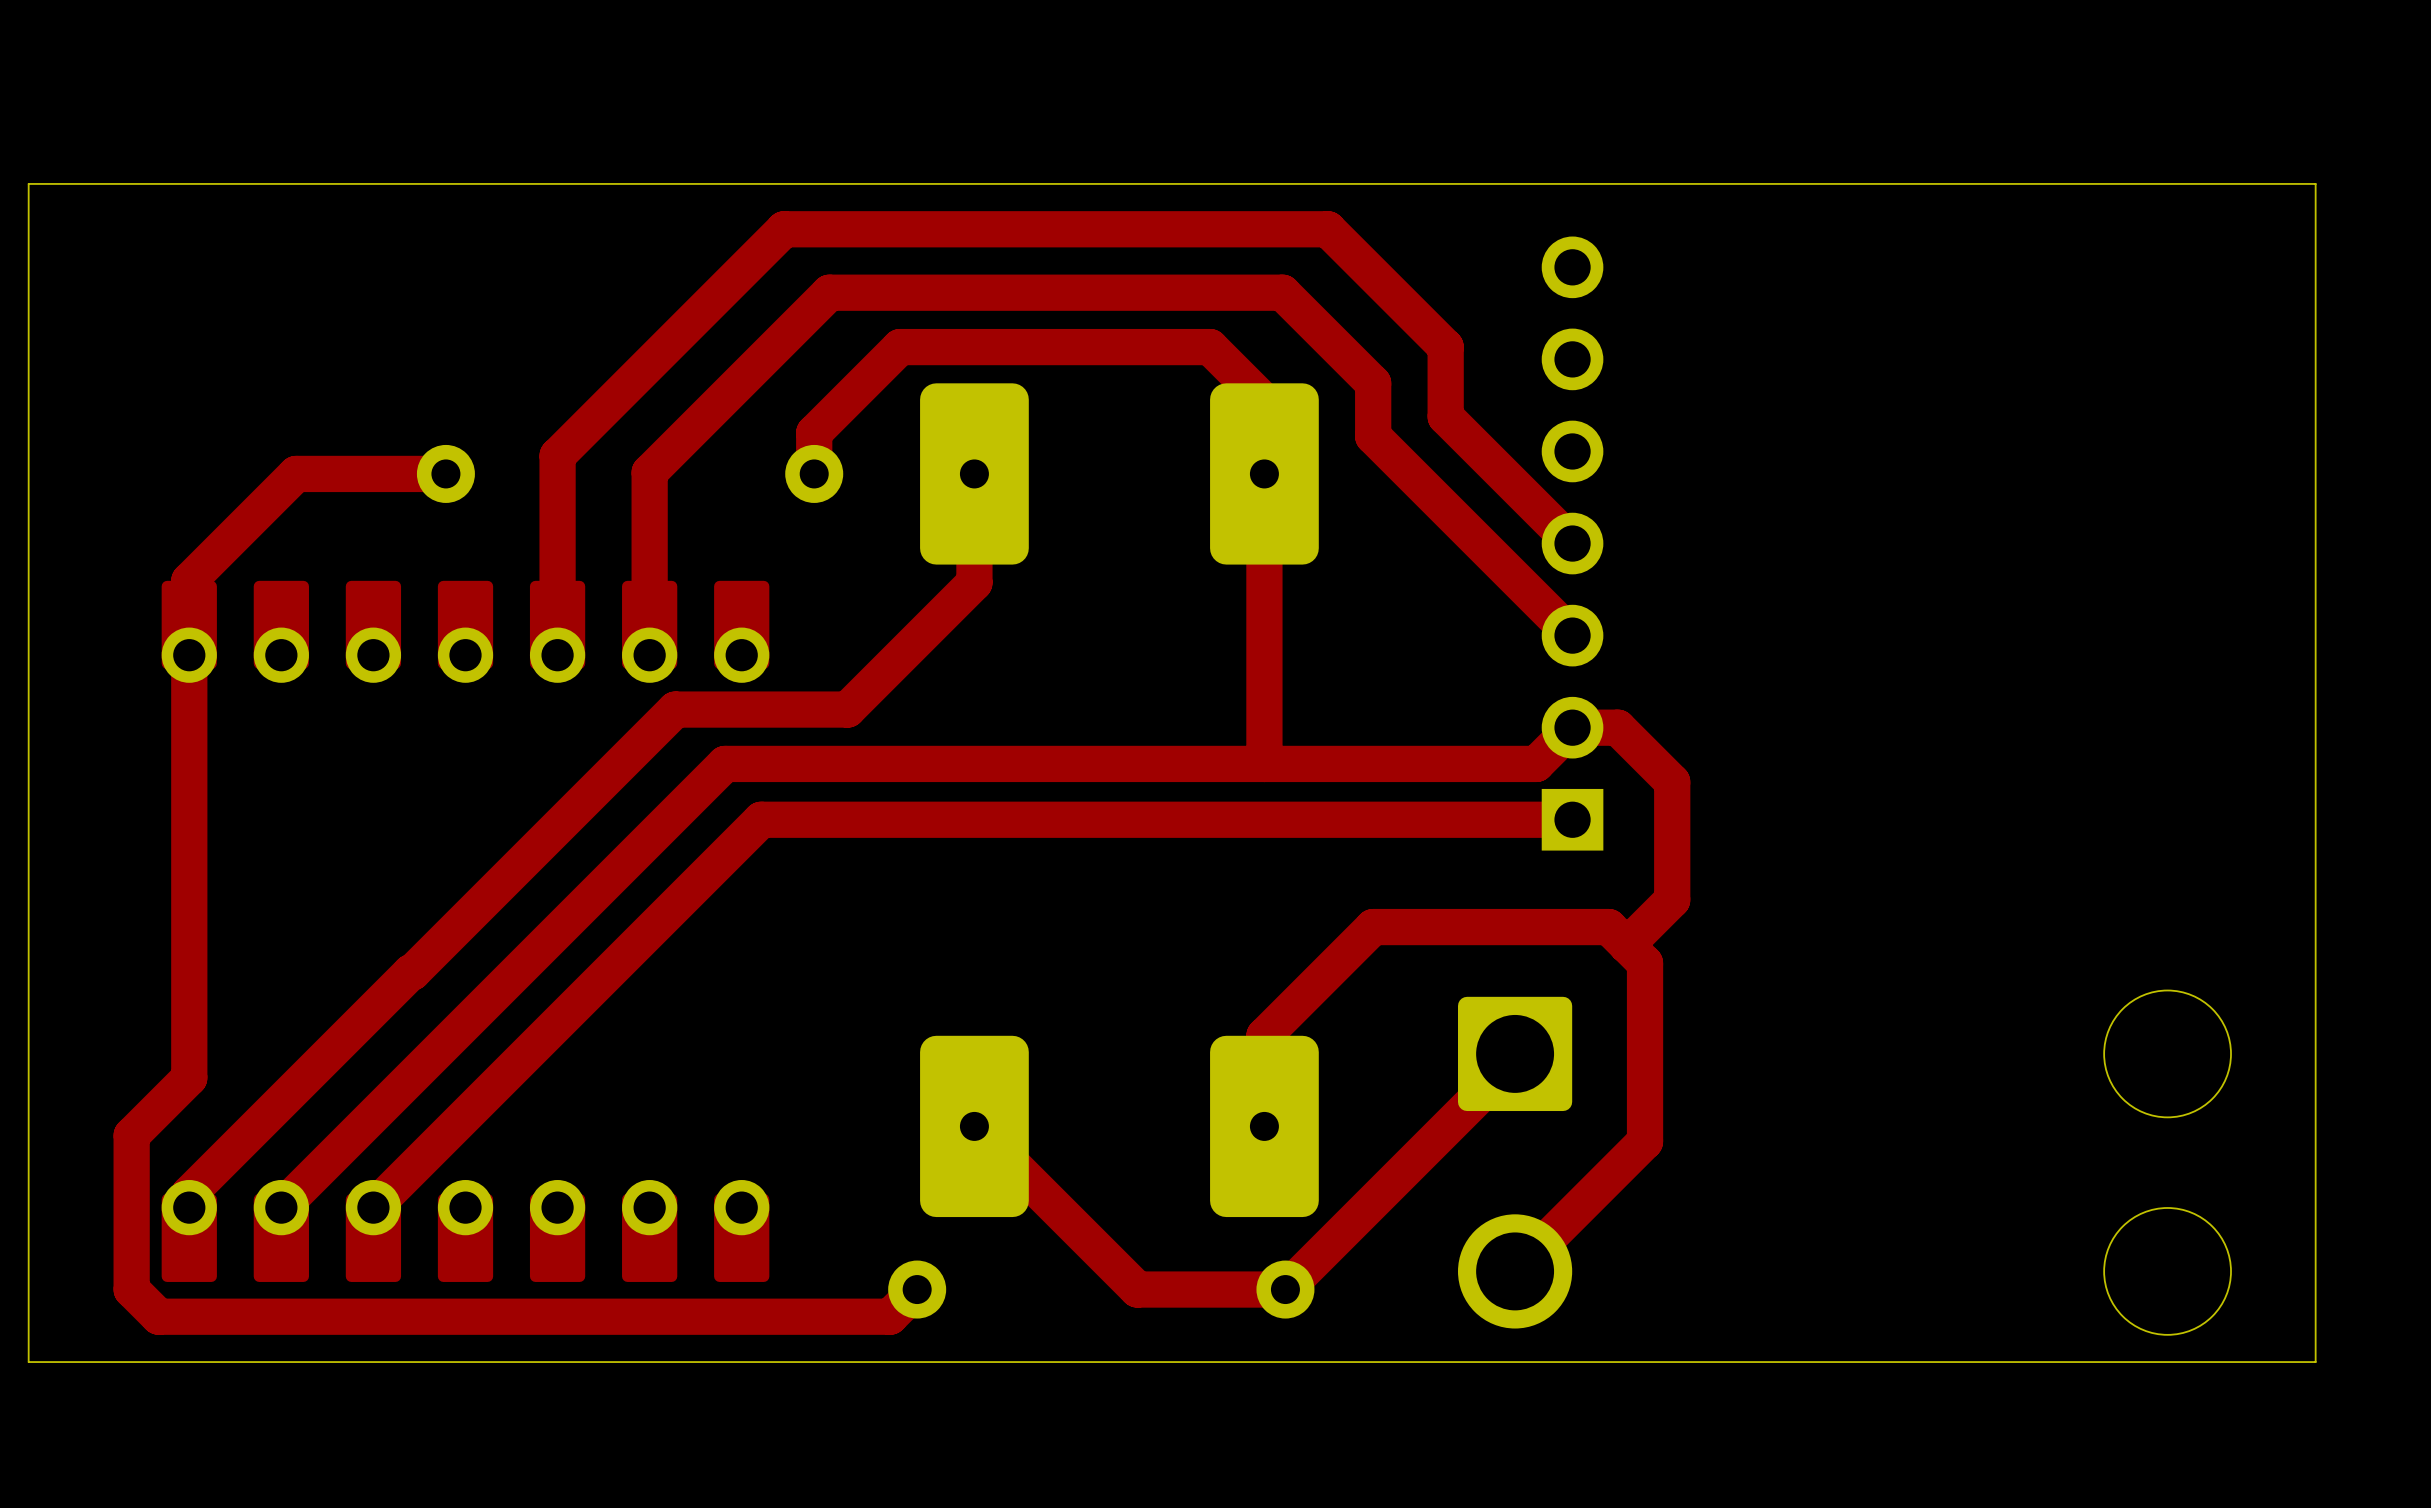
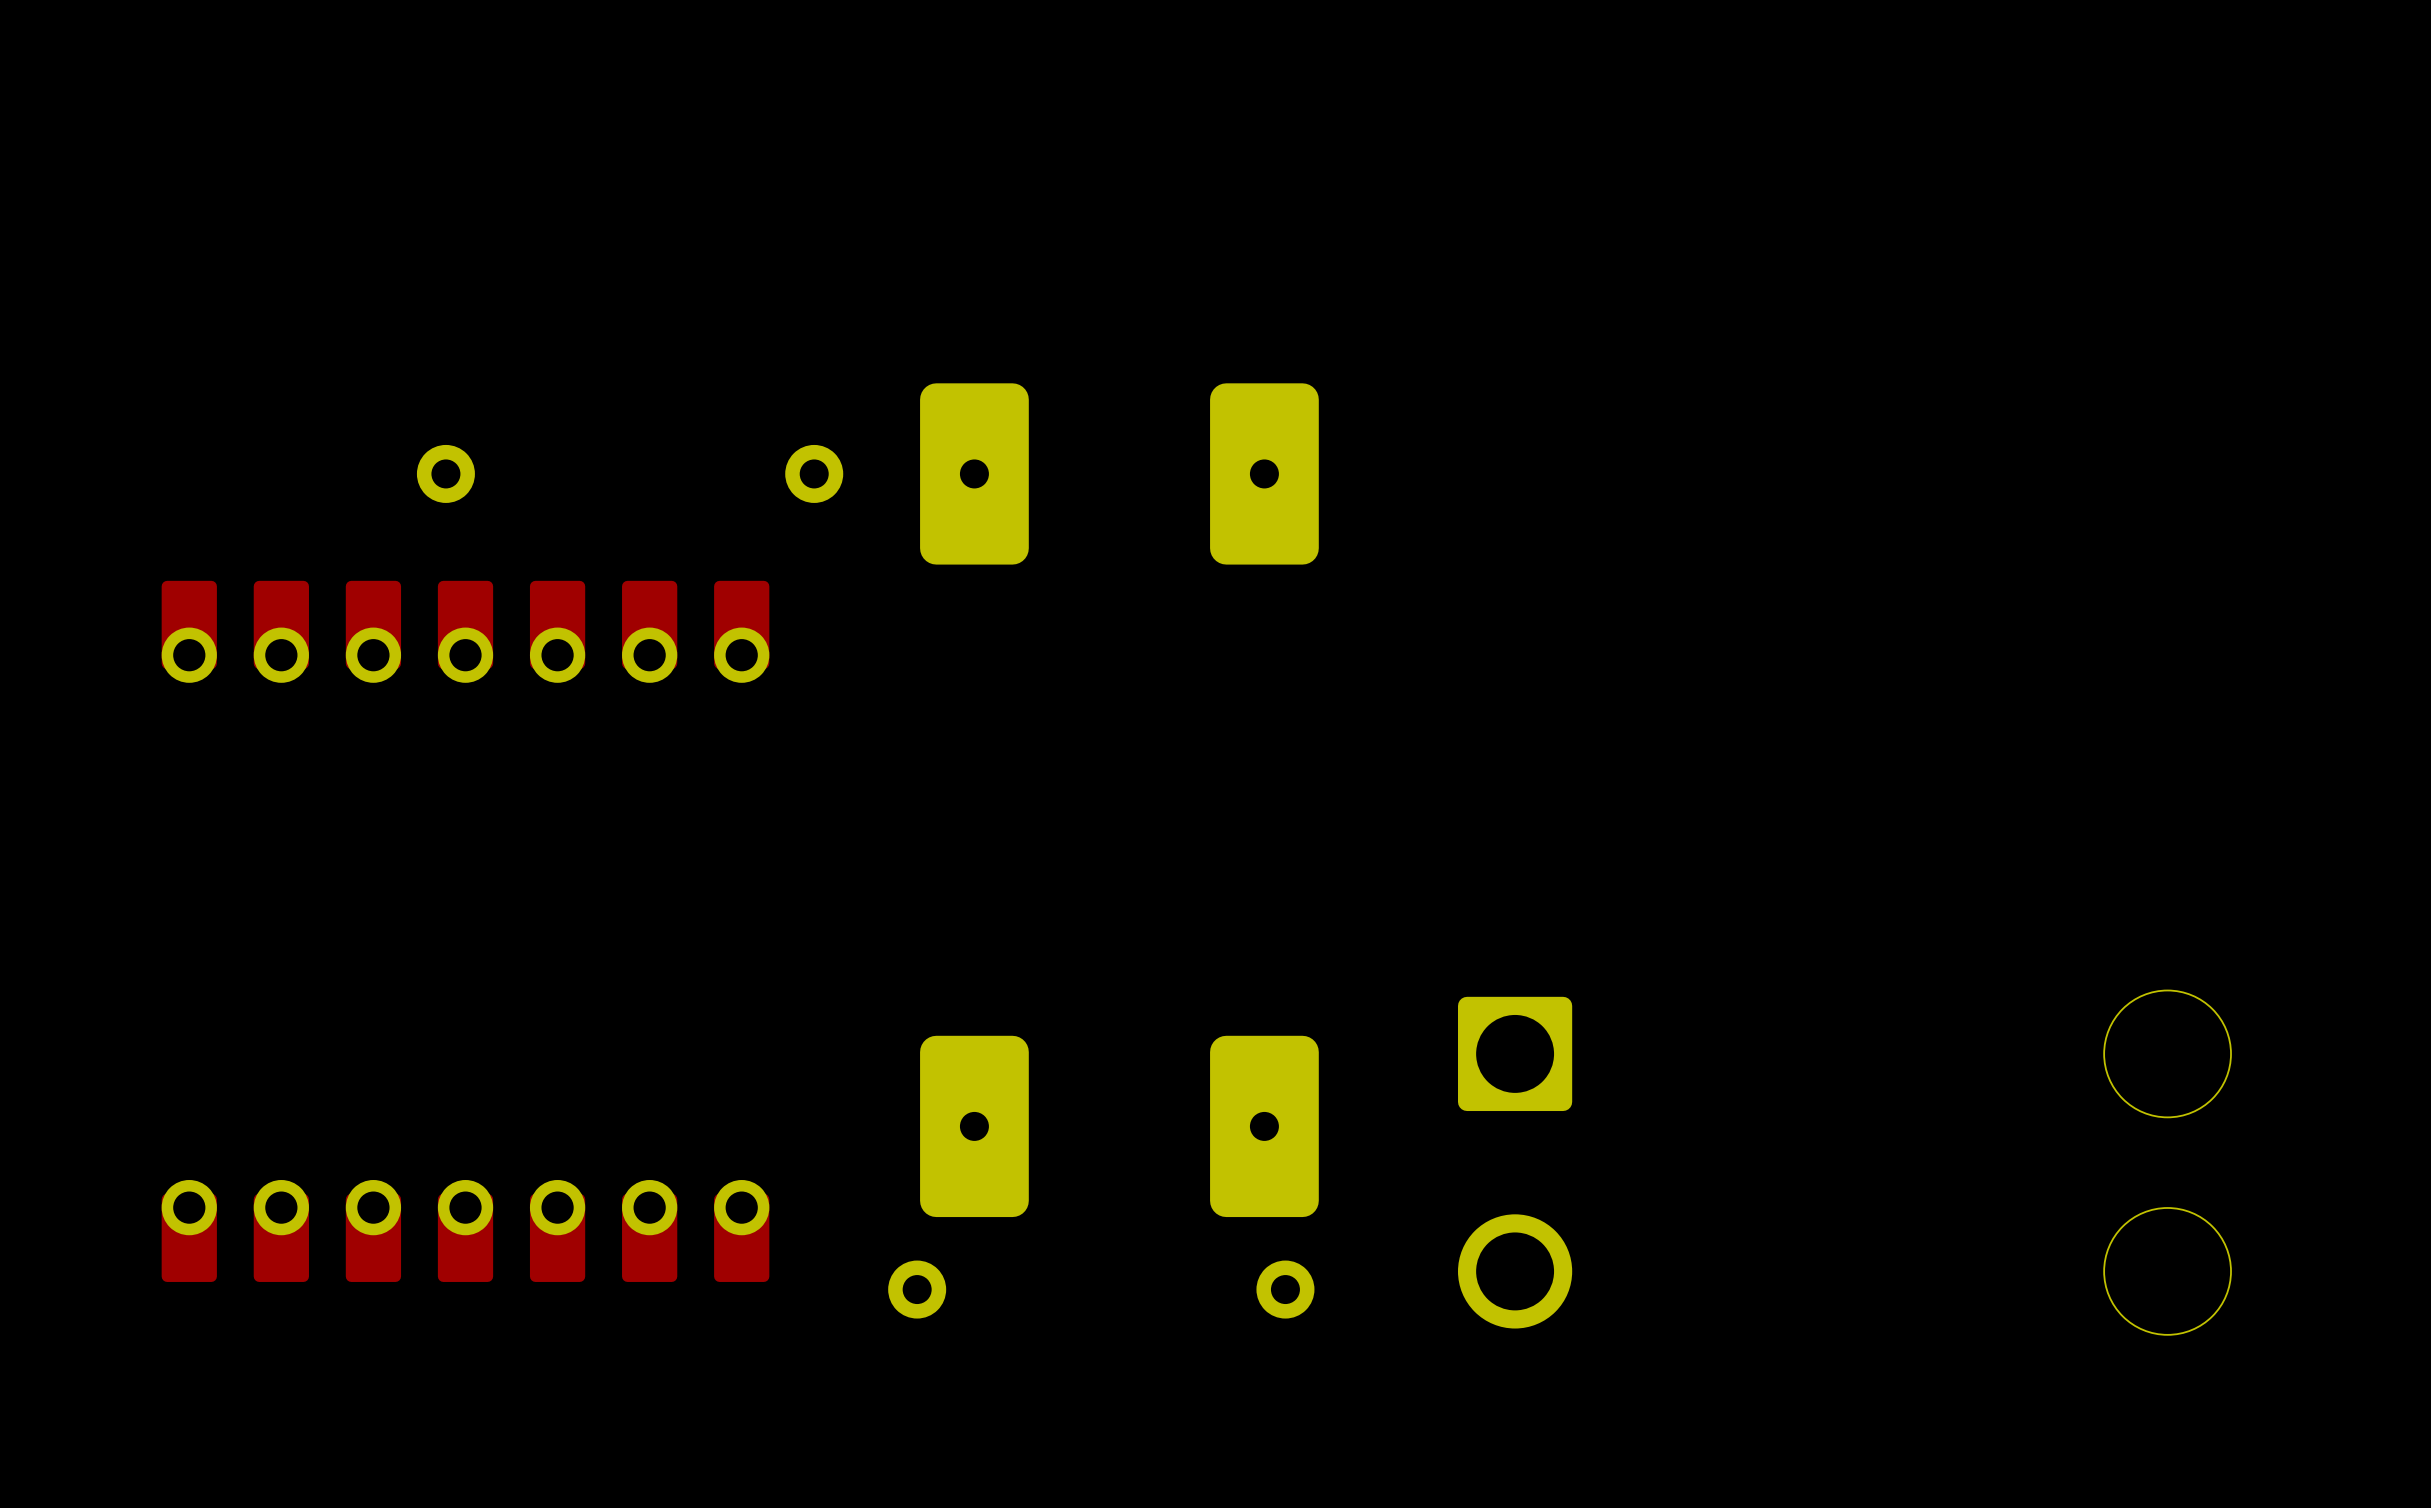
board edge: (2315, 183) (28, 183) (28, 1362) (2315, 1362) (2315, 183) -> none
top track: (445, 473) (296, 473) (189, 580) (189, 624) -> none
top track: (814, 473) (814, 432) (900, 347) (1210, 347) (1264, 401) (1264, 763) -> none
top track: (974, 473) (974, 582) (847, 709) (675, 709) (189, 1193) (189, 1237) -> none
top track: (1572, 543) (1445, 416) (1445, 347) (1327, 229) (784, 229) (557, 455) (557, 624) -> none
part: (1572, 543) -> none
top track: (649, 624) (649, 472) (829, 292) (1282, 292) (1373, 383) (1373, 436) (1572, 635) -> none
top track: (189, 655) (189, 1077) (131, 1135) (131, 1289) (158, 1316) (889, 1316) (917, 1289) -> none
top track: (1572, 819) (761, 819) (373, 1207) -> none
top track: (1626, 945) (1672, 899) (1672, 782) (1617, 727) (1572, 727) (1536, 763) (725, 763) (281, 1207) -> none
top track: (1515, 1053) (1515, 1059) (1285, 1289) (1137, 1289) (974, 1126) -> none
top track: (1264, 1126) (1264, 1035) (1373, 927) (1608, 927) (1645, 963) (1645, 1141) (1515, 1271) -> none

